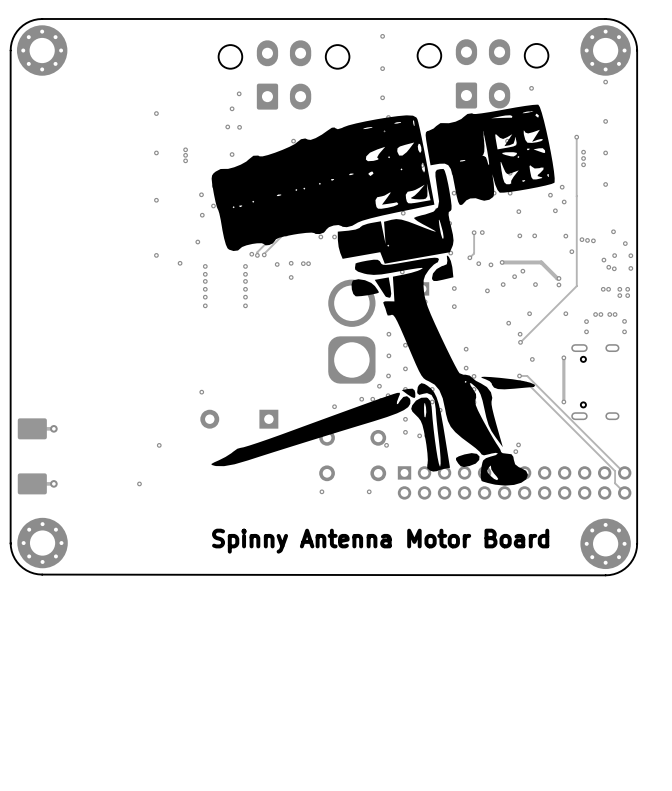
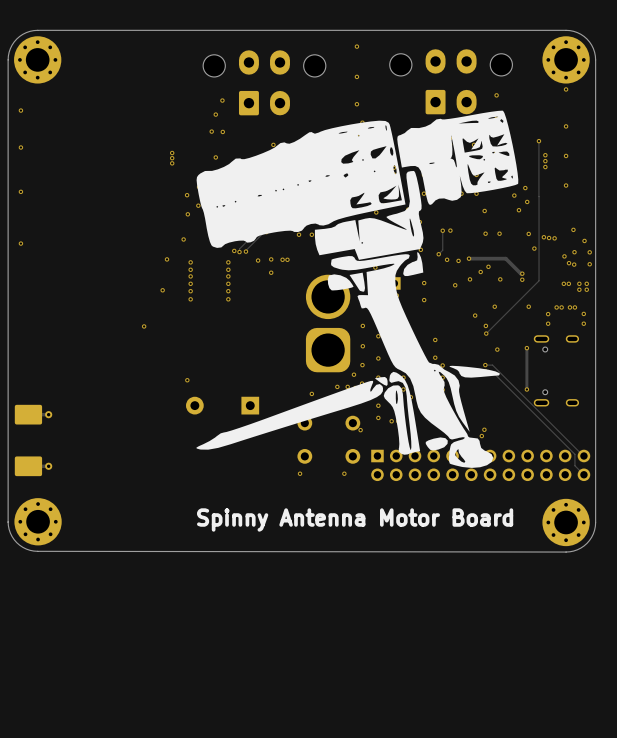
via: none -> (20, 110)
via: (156, 113) -> none
via: none -> (20, 147)
via: (156, 152) -> none
via: none -> (20, 191)
via: (156, 200) -> none
via: none -> (20, 243)
via: (156, 255) -> none
via: none -> (162, 290)
via: none -> (144, 326)
via: (159, 445) -> none
via: (139, 483) -> none

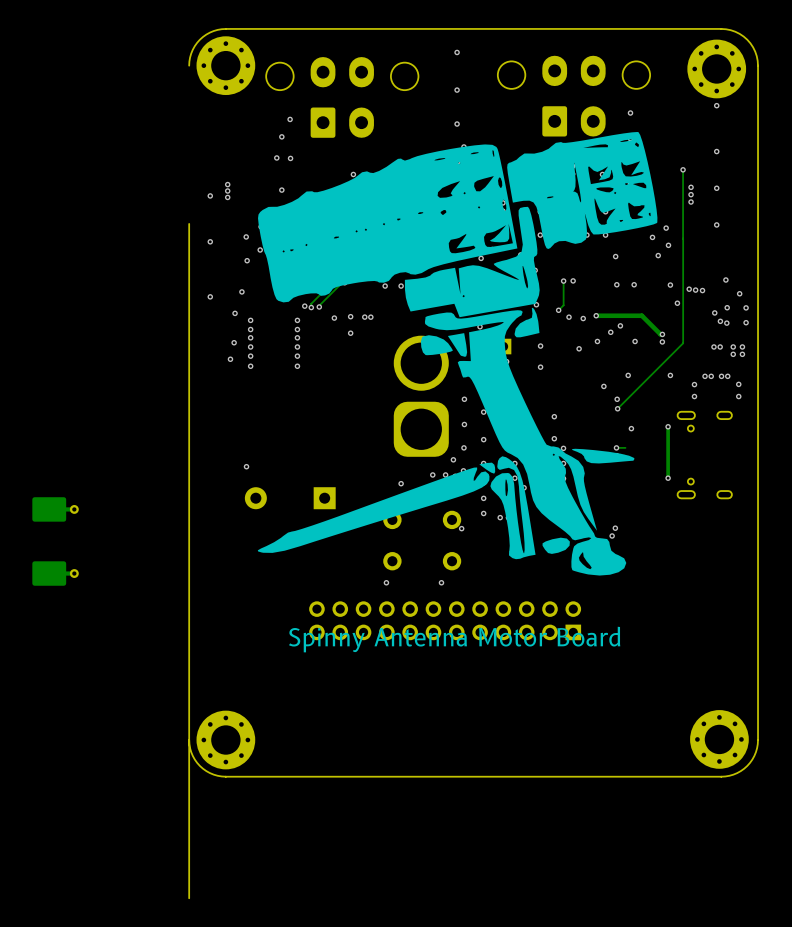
board edge: none -> (189, 65) (191, 53) (199, 39) (209, 32) (225, 28) (721, 28) (739, 33) (750, 43) (756, 56) (758, 65) (758, 739)
part position: (37, 59) -> (225, 65)
via: (20, 110) -> none
via: (20, 147) -> none
via: none -> (210, 195)
board edge: none -> (189, 223) (189, 898)
via: (20, 191) -> none
via: none -> (210, 241)
via: (20, 243) -> none
via: none -> (210, 296)
via: none -> (235, 313)
via: (167, 259) -> none
via: none -> (234, 342)
via: (162, 290) -> none
via: none -> (230, 359)
via: (144, 326) -> none
track: (492, 365) (583, 456) -> none
track: (491, 371) (574, 454) (574, 465) (583, 474) -> none
part rotation: 0° (480, 465) -> 180° (445, 620)
part position: (480, 465) -> (445, 620)
board edge: (8, 521) (8, 525) (9, 529) (10, 533) (16, 542) (26, 549) (37, 551) (566, 552) (577, 549) (584, 545) (593, 533) (595, 522) (595, 59) (594, 52) (589, 41) (580, 34) (566, 30) (37, 30) (26, 32) (19, 36) (10, 48) (8, 59) (8, 522) -> none
part position: (38, 521) -> (225, 740)
part position: (566, 522) -> (719, 739)
board edge: none -> (189, 740) (192, 755) (199, 765) (213, 774) (225, 776)
board edge: none -> (758, 740) (755, 752) (750, 762) (737, 773) (725, 776) (225, 776)

